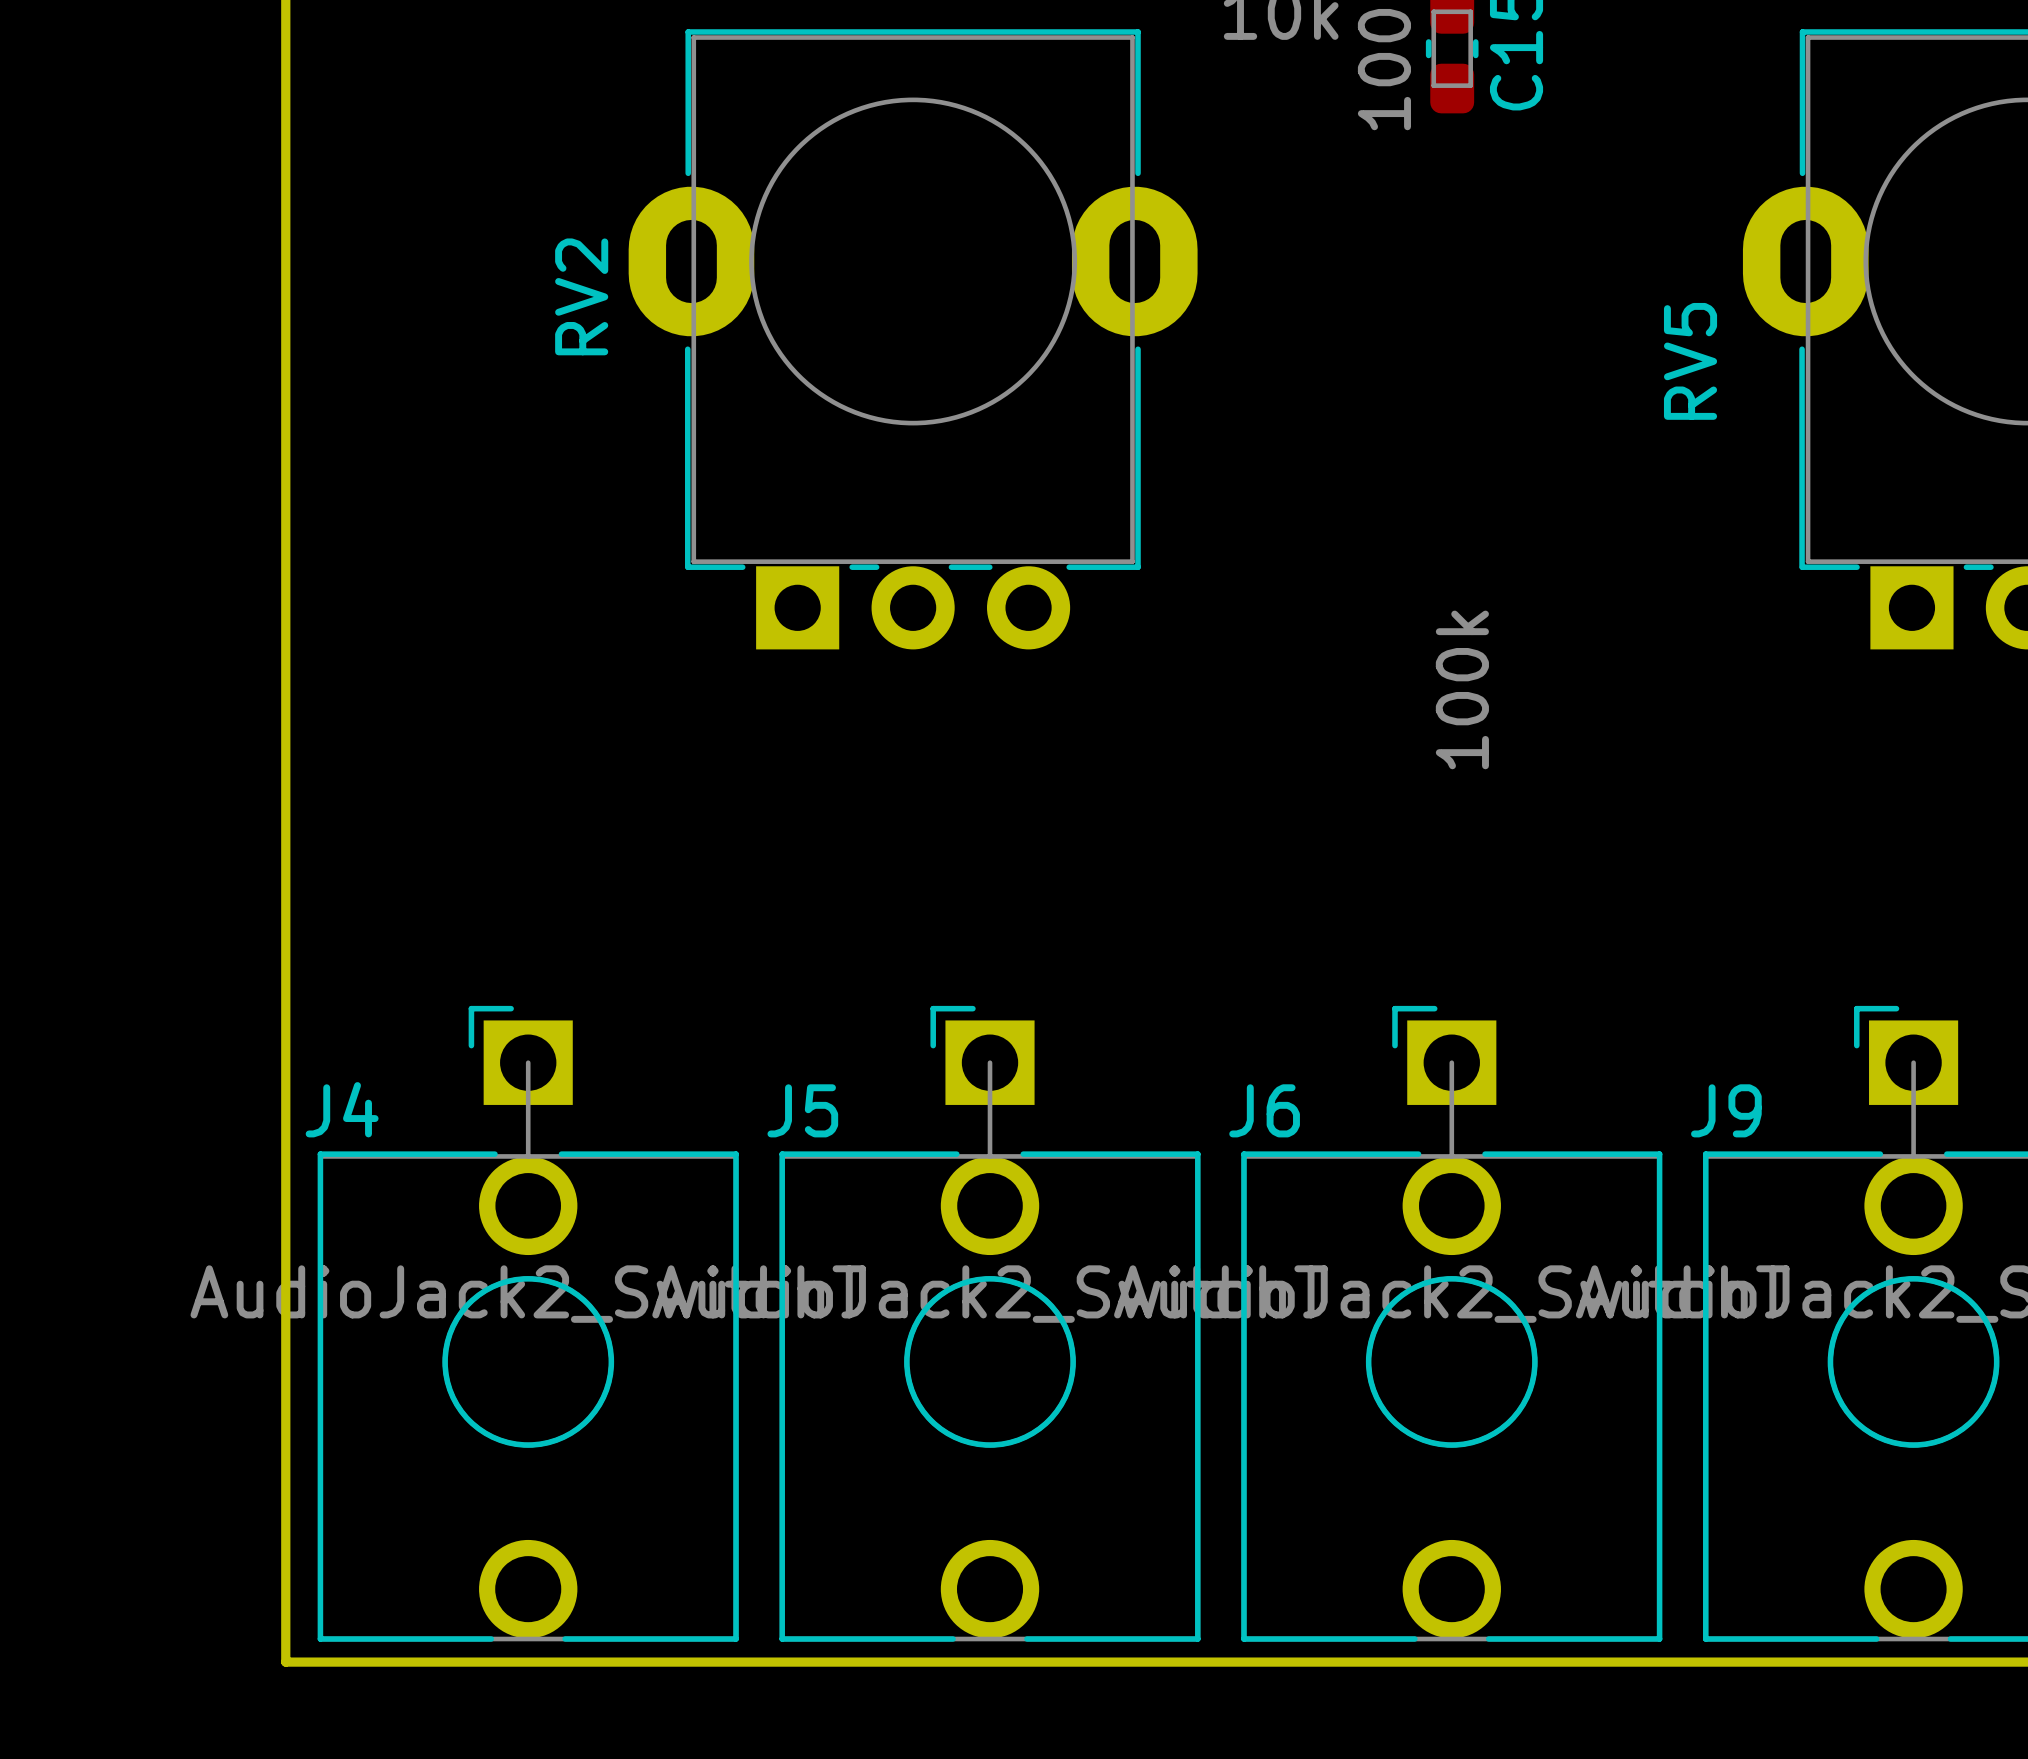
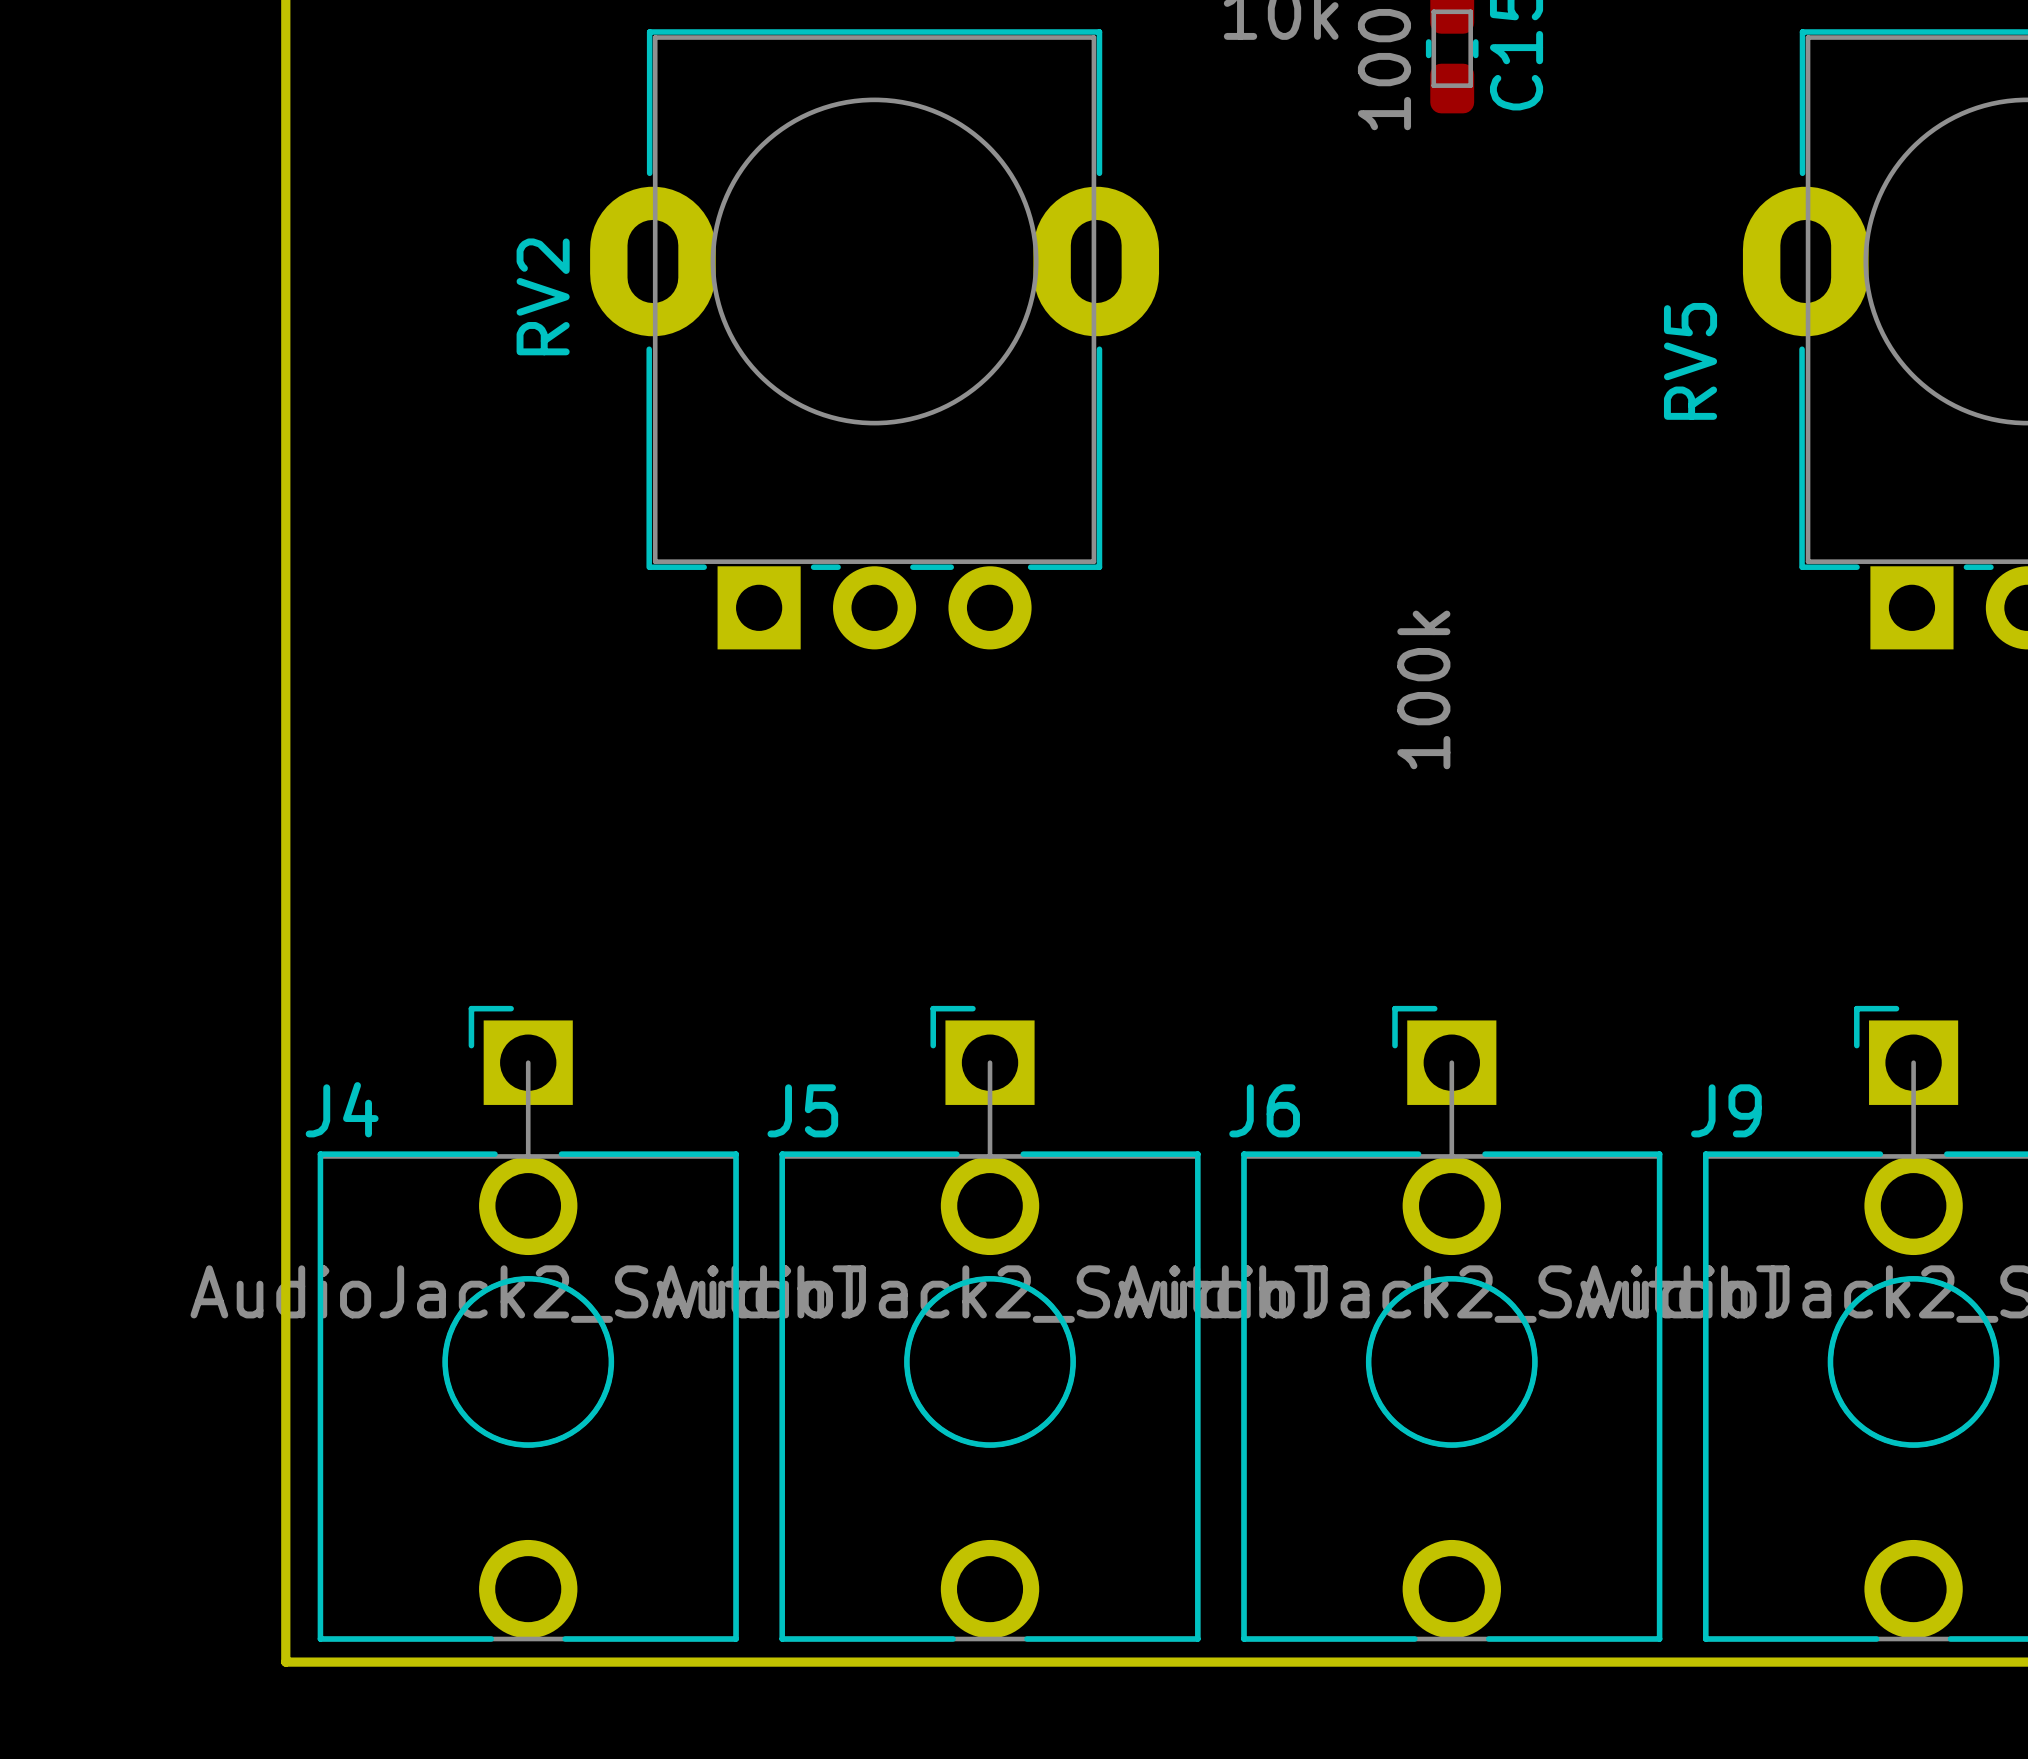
RV2 position: (913, 339) -> (874, 339)

